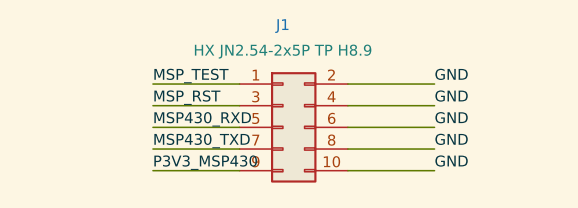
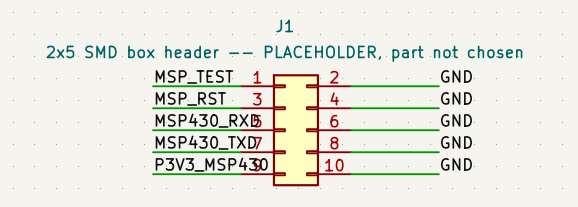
J1 value: HX JN2.54-2x5P TP H8.9 (283, 51) -> 2x5 SMD box header -- PLACEHOLDER, part not chosen (284, 53)

